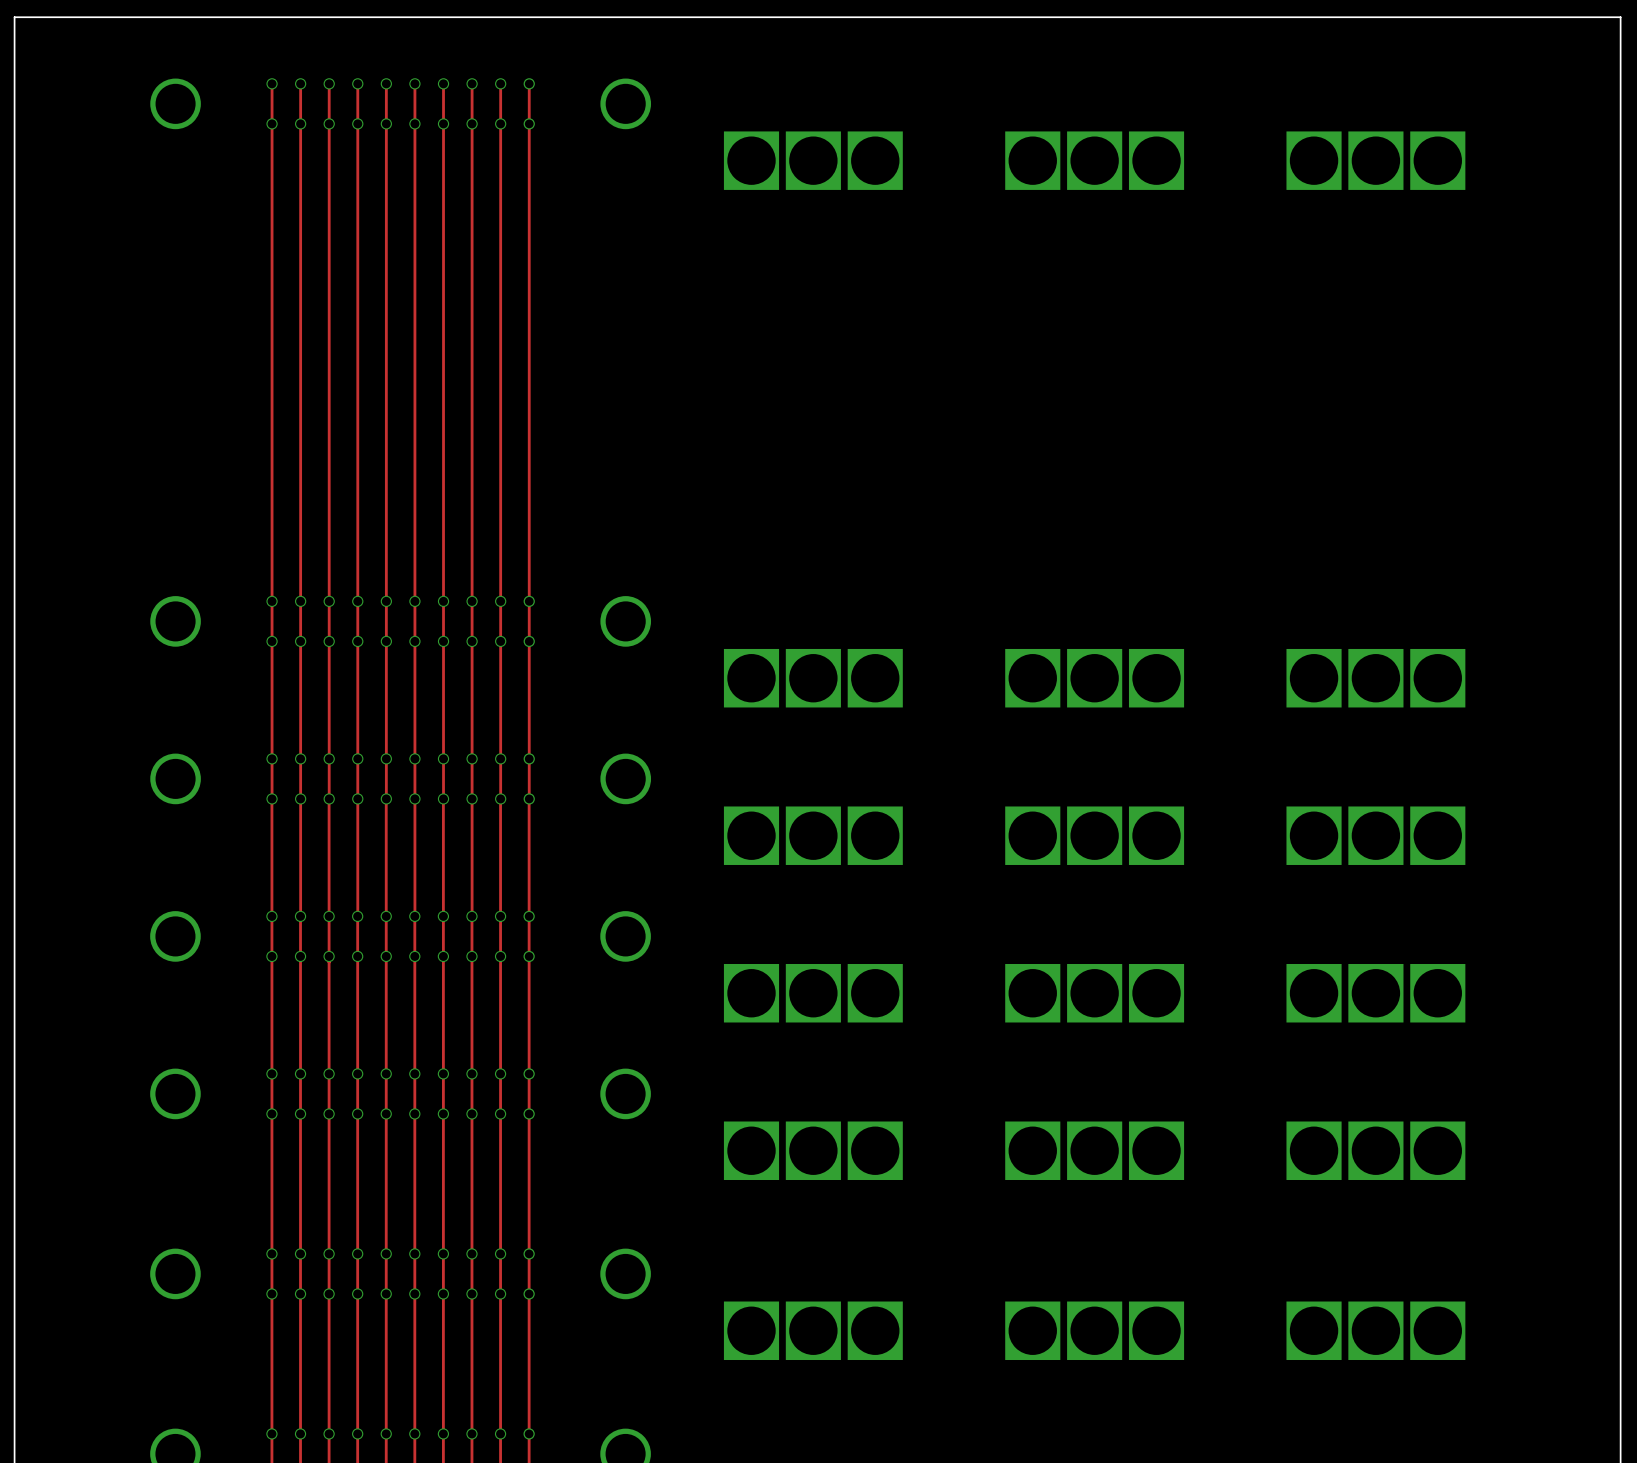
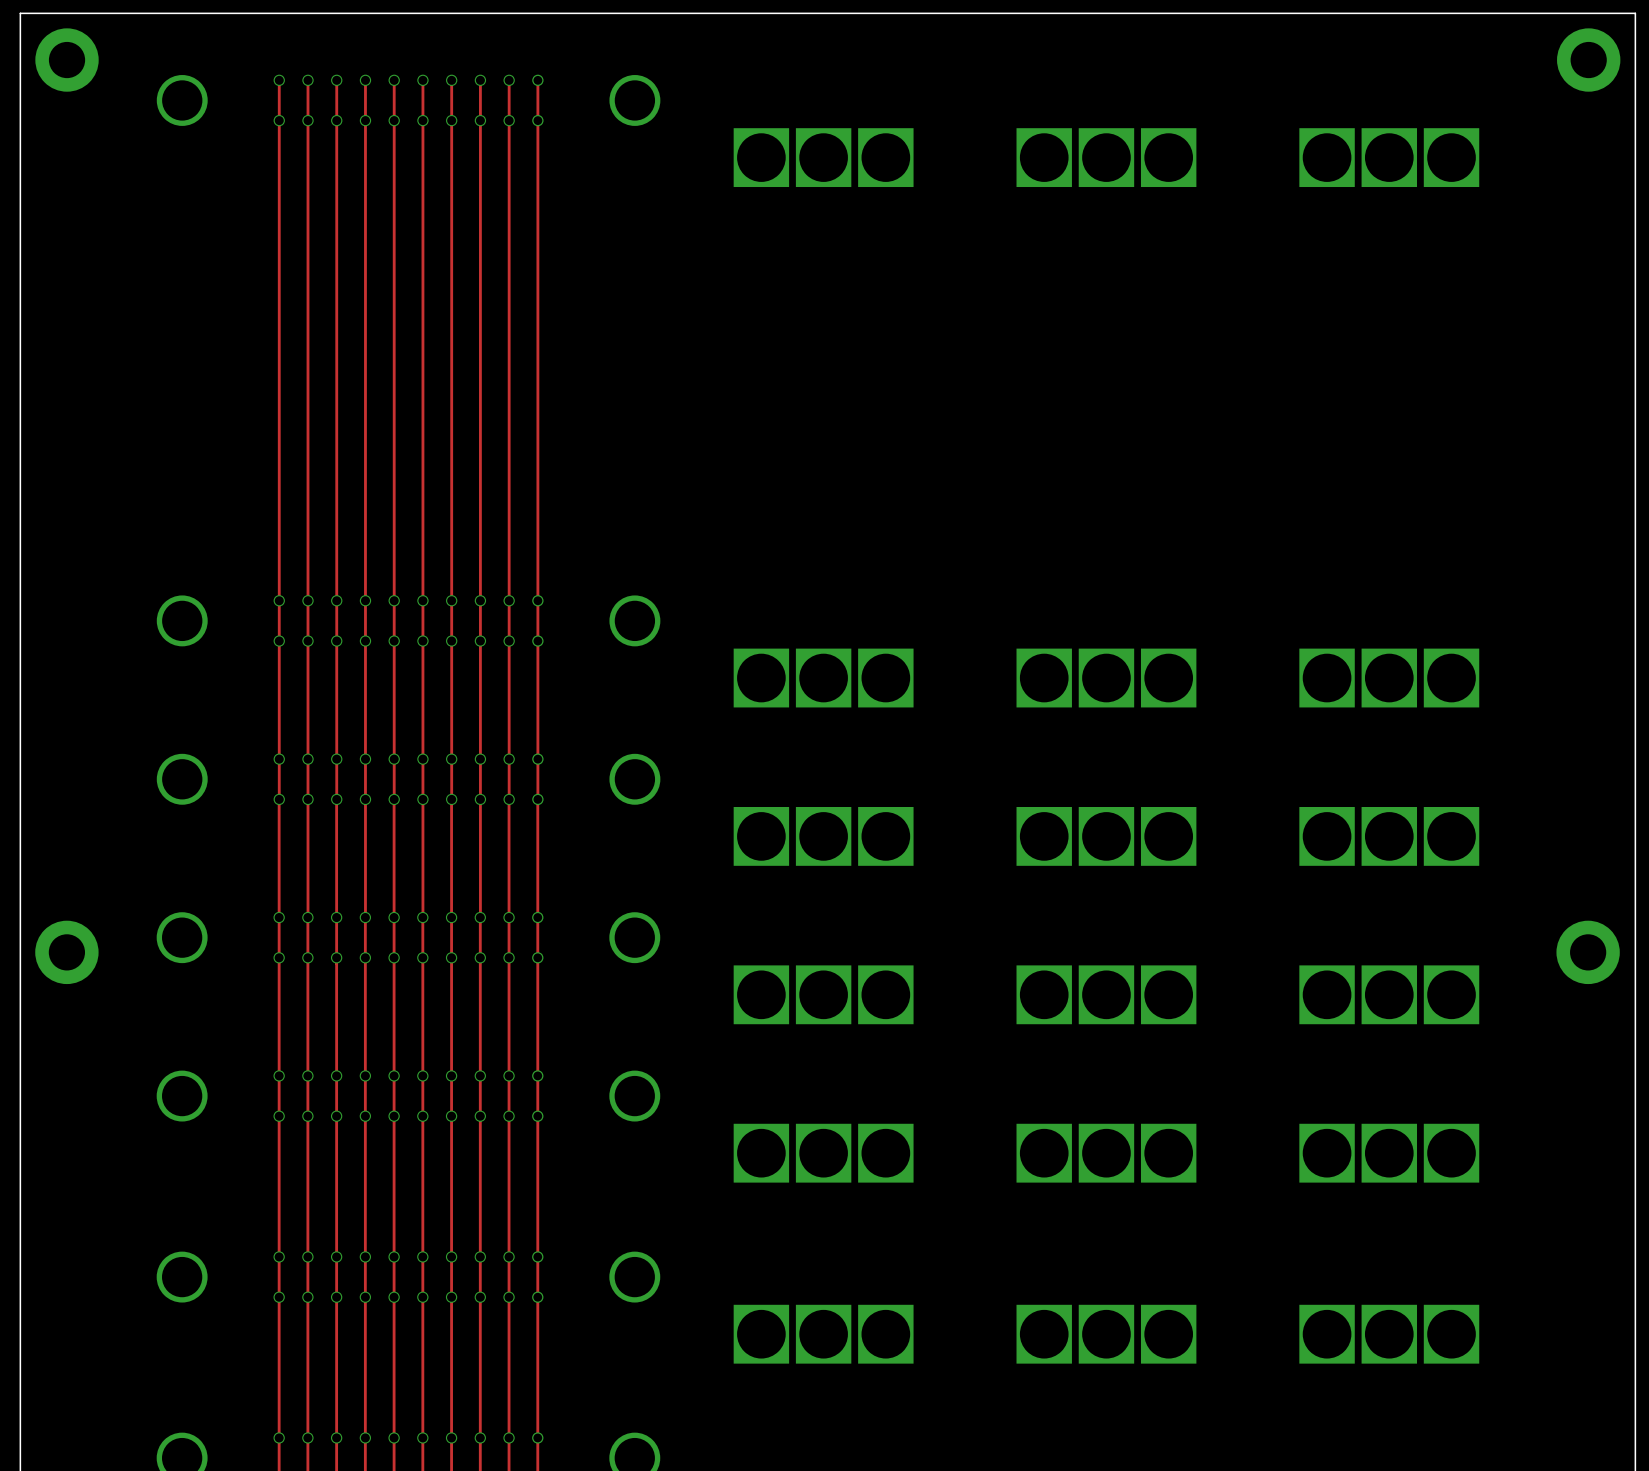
part: none -> (67, 60)
part: none -> (1588, 60)
part: none -> (66, 952)
part: none -> (1588, 952)

